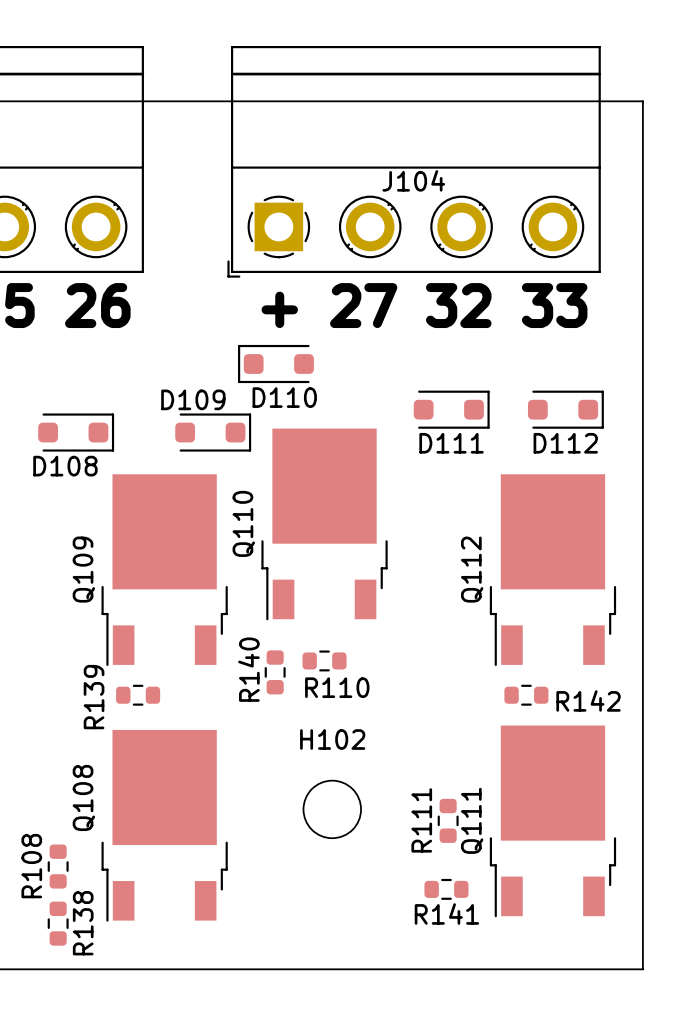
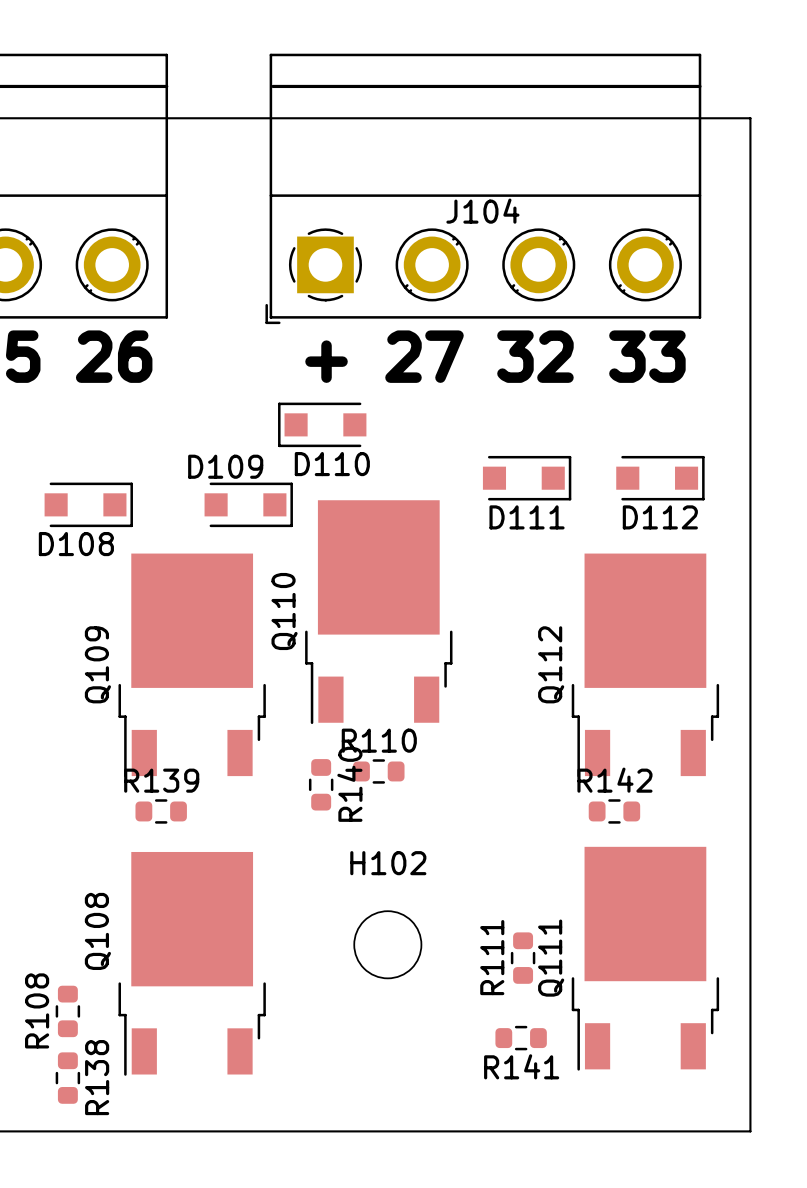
D110 footprint: [238, 344, 314, 384] -> [278, 402, 367, 448]
D111 footprint: [413, 390, 490, 429] -> [482, 455, 572, 501]
D112 footprint: [527, 390, 604, 429] -> [616, 455, 705, 501]
D108 footprint: [38, 413, 115, 452] -> [44, 482, 133, 528]
D109 footprint: [175, 413, 252, 452] -> [204, 482, 293, 528]
R140 name position: R140 (248, 669) -> R140 (349, 784)
R110 name position: R110 (337, 687) -> R110 (379, 740)
R139 name rotation: 0° (94, 697) -> 90° clockwise (161, 780)
R142 name position: R142 (588, 700) -> R142 (614, 780)

